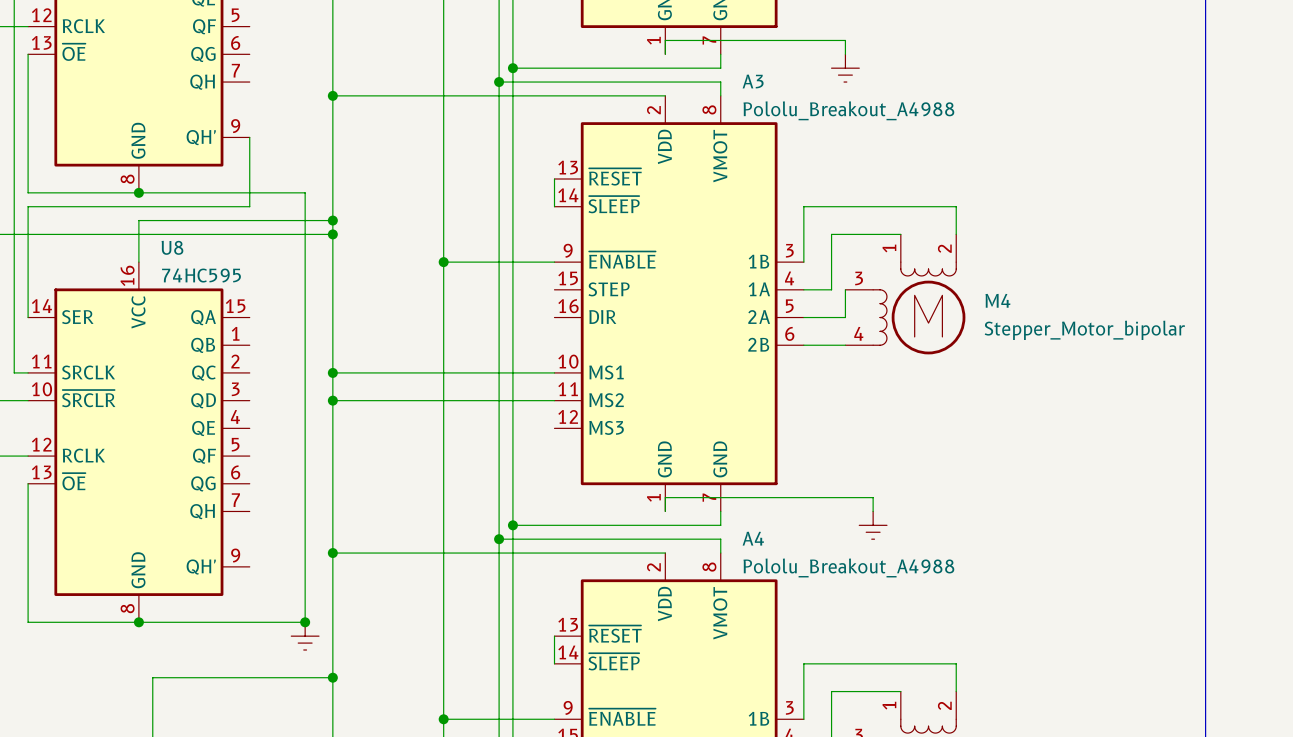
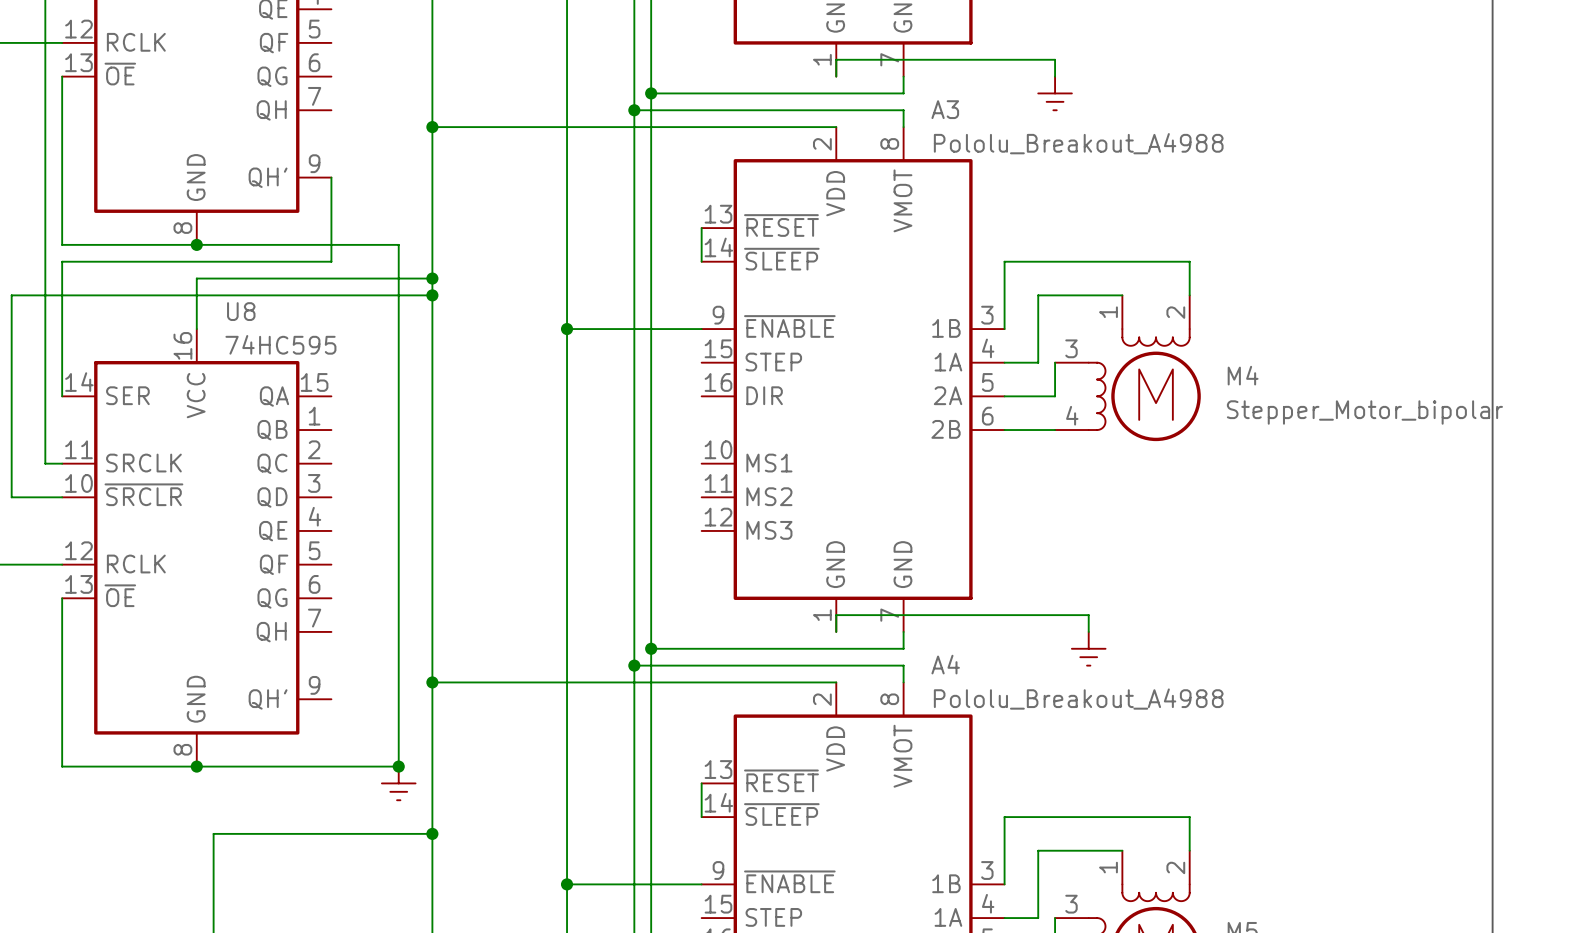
wire: (332, 372) (554, 372) -> none
junction: (332, 372) -> none
wire: (332, 400) (554, 400) -> none
junction: (332, 400) -> none

